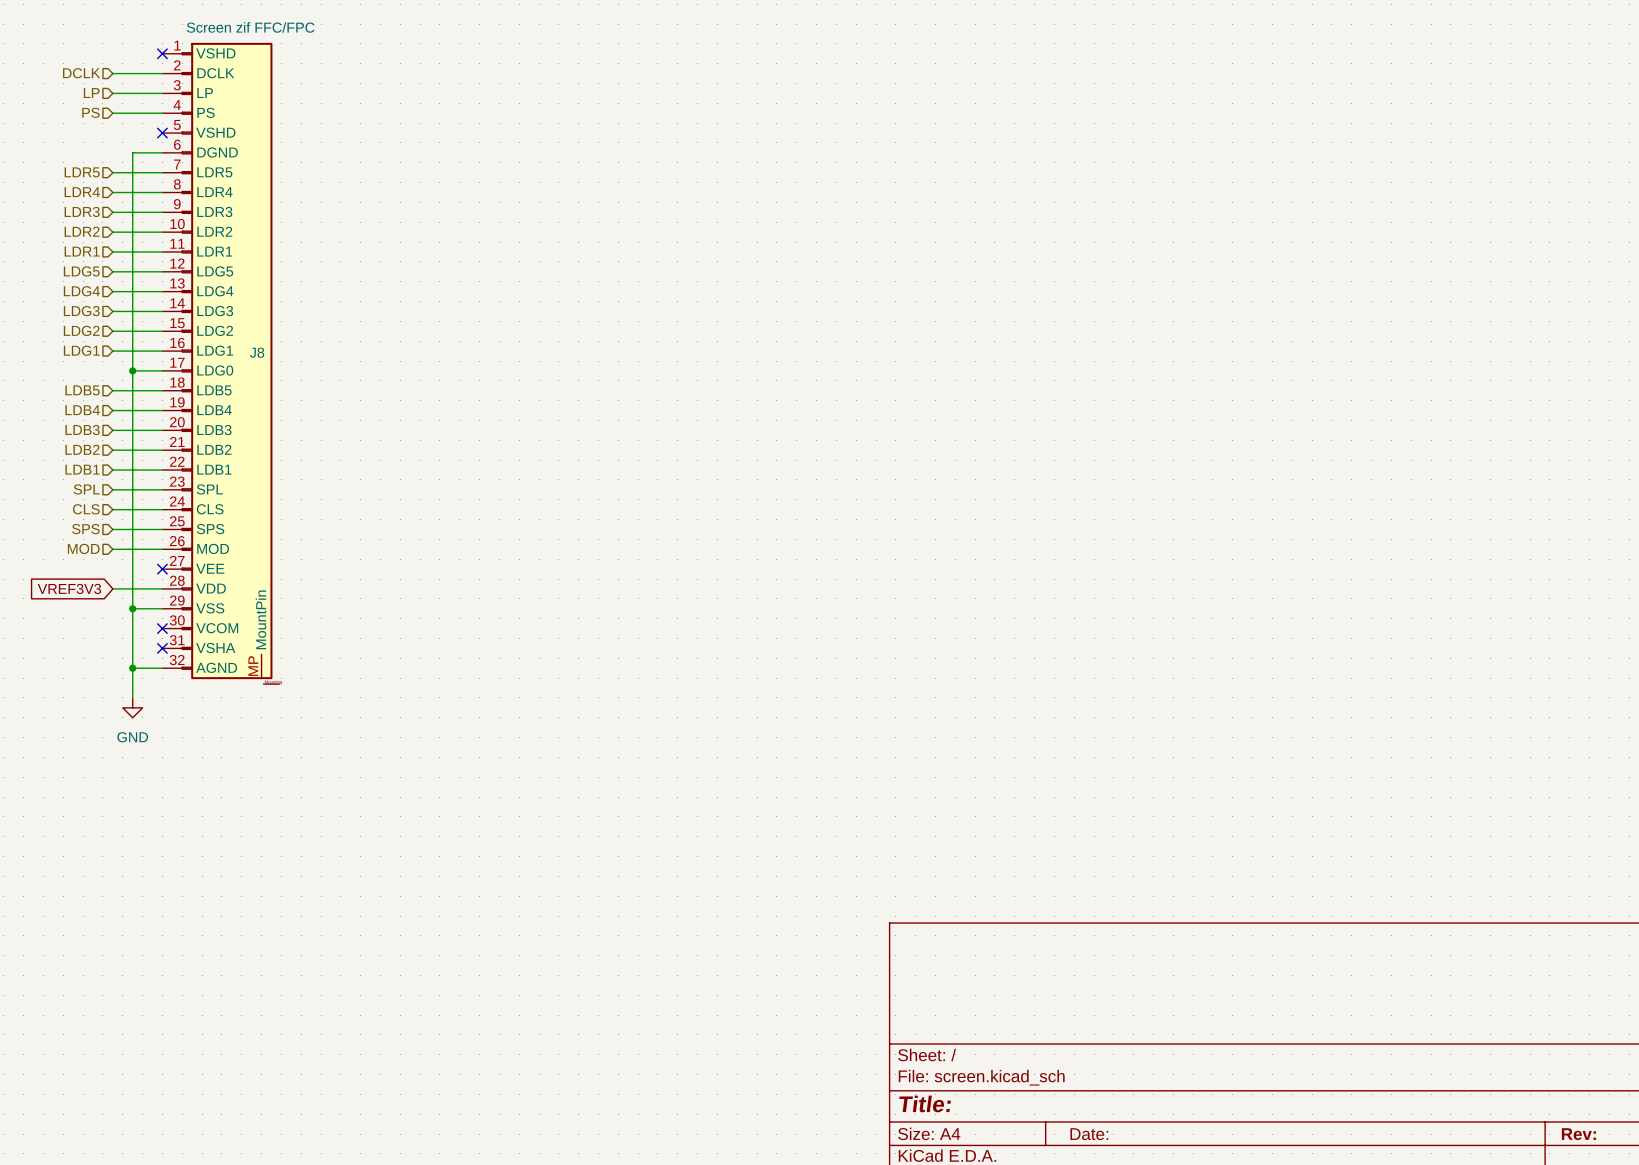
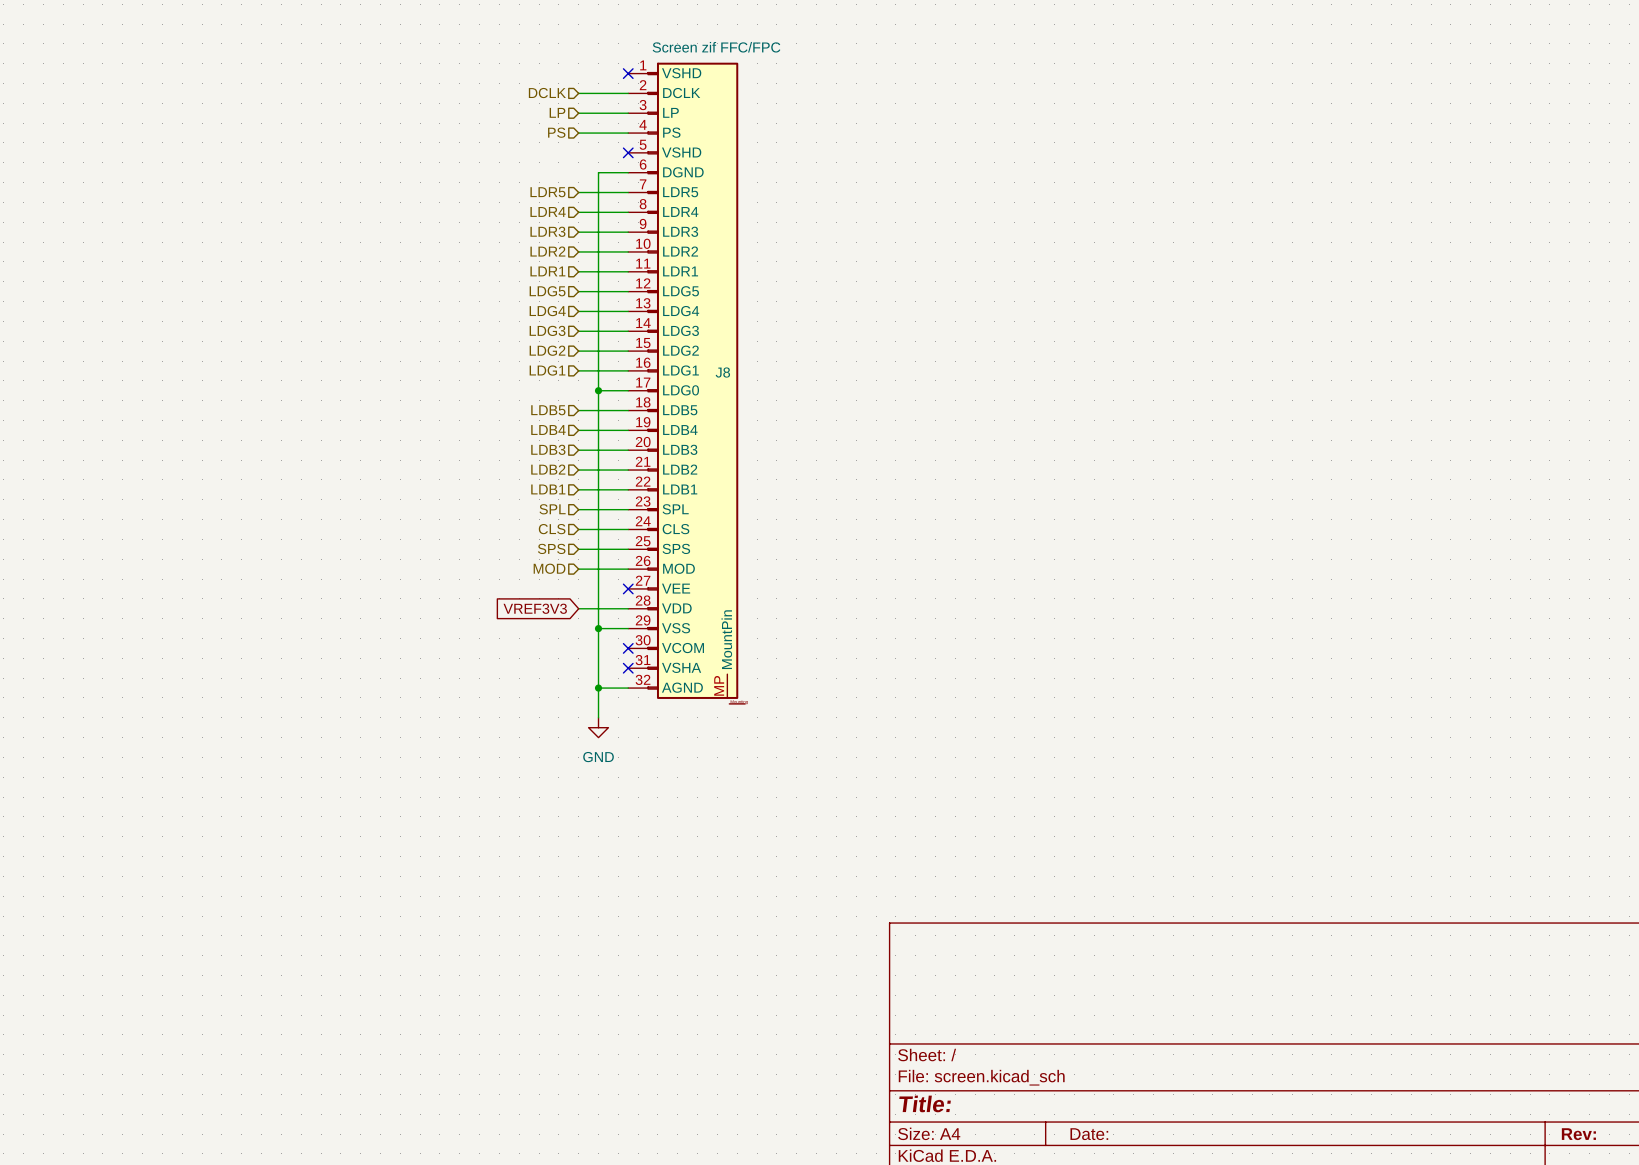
no-connect mark: (162, 53) -> none
hierarchical label: DCLK (81, 73) -> none
wire: (112, 73) (162, 73) -> none
no-connect mark: none -> (628, 73)
hierarchical label: LP (91, 93) -> none
wire: (112, 93) (162, 93) -> none
hierarchical label: none -> DCLK (547, 93)
wire: none -> (578, 93) (628, 93)
hierarchical label: PS (90, 112) -> none
hierarchical label: none -> LP (557, 112)
wire: (112, 113) (162, 113) -> none
wire: none -> (578, 113) (628, 113)
hierarchical label: none -> PS (556, 132)
no-connect mark: (162, 133) -> none
wire: none -> (578, 133) (628, 133)
wire: (162, 152) (132, 152) (132, 697) -> none
no-connect mark: none -> (628, 152)
hierarchical label: LDR5 (82, 172) -> none
wire: (112, 172) (162, 172) -> none
wire: none -> (628, 172) (598, 172) (598, 717)
hierarchical label: LDR4 (82, 192) -> none
wire: (112, 192) (162, 192) -> none
hierarchical label: none -> LDR5 (547, 192)
wire: none -> (578, 192) (628, 192)
hierarchical label: LDR3 (82, 211) -> none
hierarchical label: none -> LDR4 (548, 211)
wire: (112, 212) (162, 212) -> none
wire: none -> (578, 212) (628, 212)
hierarchical label: LDR2 (82, 231) -> none
hierarchical label: none -> LDR3 (547, 231)
wire: (112, 232) (162, 232) -> none
wire: none -> (578, 232) (628, 232)
hierarchical label: LDR1 (82, 251) -> none
wire: (112, 251) (162, 251) -> none
hierarchical label: none -> LDR2 (547, 251)
wire: none -> (578, 251) (628, 251)
hierarchical label: LDG5 (81, 271) -> none
wire: (112, 271) (162, 271) -> none
hierarchical label: none -> LDR1 (547, 271)
wire: none -> (578, 271) (628, 271)
hierarchical label: LDG4 (81, 291) -> none
wire: (112, 291) (162, 291) -> none
hierarchical label: none -> LDG5 (547, 291)
wire: none -> (578, 291) (628, 291)
hierarchical label: LDG3 (81, 311) -> none
wire: (112, 311) (162, 311) -> none
hierarchical label: none -> LDG4 (547, 311)
wire: none -> (578, 311) (628, 311)
hierarchical label: LDG2 (81, 330) -> none
hierarchical label: none -> LDG3 (547, 330)
wire: (112, 331) (162, 331) -> none
wire: none -> (578, 331) (628, 331)
hierarchical label: LDG1 (81, 350) -> none
hierarchical label: none -> LDG2 (547, 350)
wire: (112, 351) (162, 351) -> none
wire: none -> (578, 351) (628, 351)
J8 position: (221, 363) -> (687, 383)
wire: (132, 370) (162, 370) -> none
junction: (132, 370) -> none
hierarchical label: none -> LDG1 (547, 370)
wire: none -> (578, 370) (628, 370)
hierarchical label: LDB5 (82, 390) -> none
wire: (112, 390) (162, 390) -> none
wire: none -> (598, 390) (628, 390)
junction: none -> (598, 390)
hierarchical label: LDB4 (82, 410) -> none
wire: (112, 410) (162, 410) -> none
hierarchical label: none -> LDB5 (548, 410)
wire: none -> (578, 410) (628, 410)
hierarchical label: LDB3 (82, 430) -> none
wire: (112, 430) (162, 430) -> none
hierarchical label: none -> LDB4 (548, 430)
wire: none -> (578, 430) (628, 430)
hierarchical label: LDB2 (82, 449) -> none
hierarchical label: none -> LDB3 (548, 449)
wire: (112, 450) (162, 450) -> none
wire: none -> (578, 450) (628, 450)
hierarchical label: LDB1 (82, 469) -> none
hierarchical label: none -> LDB2 (548, 469)
wire: (112, 470) (162, 470) -> none
wire: none -> (578, 470) (628, 470)
hierarchical label: SPL (86, 489) -> none
wire: (112, 489) (162, 489) -> none
hierarchical label: none -> LDB1 (548, 489)
wire: none -> (578, 489) (628, 489)
hierarchical label: CLS (86, 509) -> none
wire: (112, 509) (162, 509) -> none
hierarchical label: none -> SPL (552, 509)
wire: none -> (578, 509) (628, 509)
hierarchical label: SPS (85, 529) -> none
wire: (112, 529) (162, 529) -> none
hierarchical label: none -> CLS (552, 529)
wire: none -> (578, 529) (628, 529)
hierarchical label: MOD (83, 548) -> none
hierarchical label: none -> SPS (551, 548)
wire: (112, 549) (162, 549) -> none
wire: none -> (578, 549) (628, 549)
hierarchical label: none -> MOD (549, 568)
no-connect mark: (162, 569) -> none
wire: none -> (578, 569) (628, 569)
global label: VREF3V3 (69, 588) -> none
wire: (112, 588) (162, 588) -> none
no-connect mark: none -> (628, 588)
wire: (132, 608) (162, 608) -> none
junction: (132, 608) -> none
global label: none -> VREF3V3 (535, 608)
wire: none -> (578, 608) (628, 608)
no-connect mark: (162, 628) -> none
wire: none -> (598, 628) (628, 628)
junction: none -> (598, 628)
no-connect mark: (162, 648) -> none
no-connect mark: none -> (628, 648)
wire: (132, 668) (162, 668) -> none
junction: (132, 668) -> none
no-connect mark: none -> (628, 668)
wire: none -> (598, 688) (628, 688)
junction: none -> (598, 688)
power symbol: GND (132, 707) -> none
power symbol: none -> GND (598, 727)

